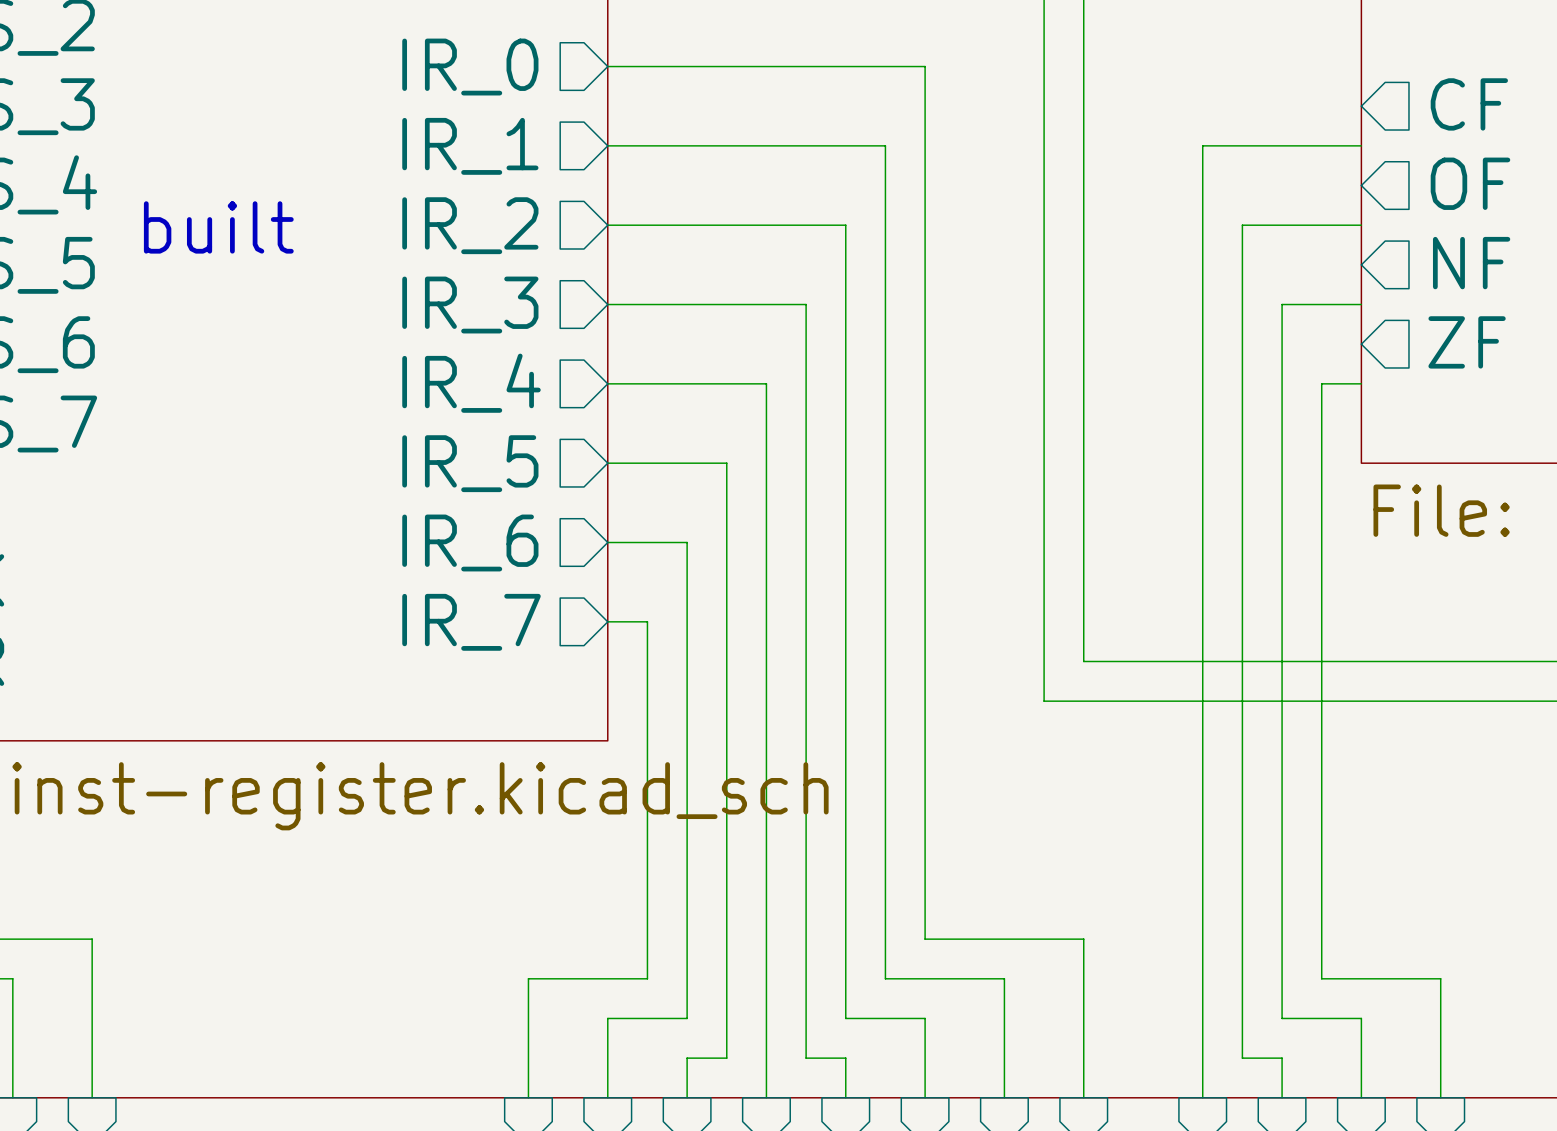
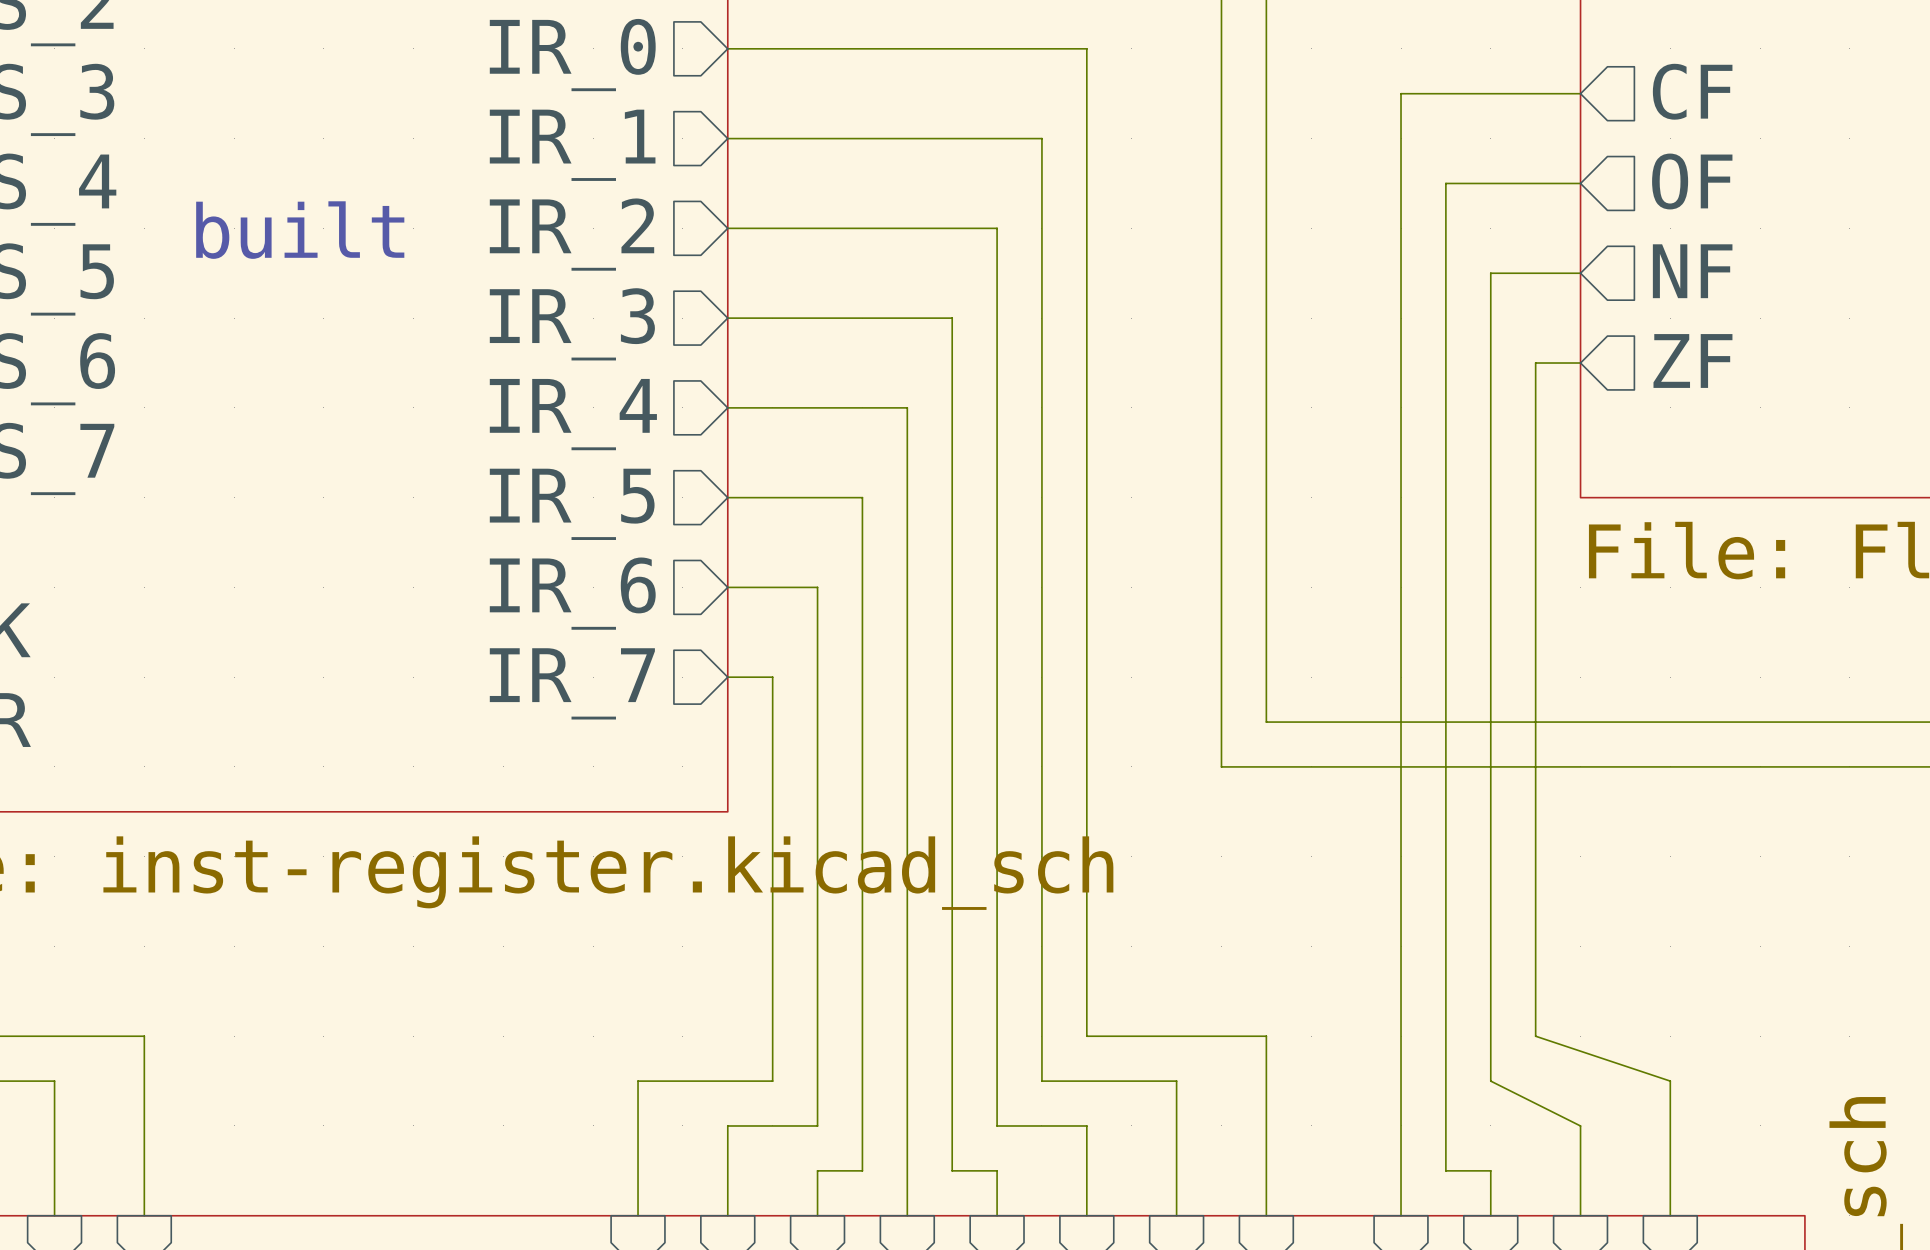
wire: (1202, 145) (1361, 145) -> (1401, 138) (1401, 93) (1580, 93)
wire: (1242, 225) (1361, 225) -> (1445, 228) (1445, 183) (1580, 183)
wire: (1282, 304) (1361, 304) -> (1490, 318) (1490, 273) (1580, 273)
wire: (1321, 383) (1361, 383) -> (1535, 407) (1535, 363) (1580, 363)
wire: (1321, 939) (1321, 978) (1440, 978) -> (1535, 1036) (1670, 1081)
wire: (1282, 978) (1282, 1018) (1361, 1018) -> (1490, 1081) (1580, 1125)

